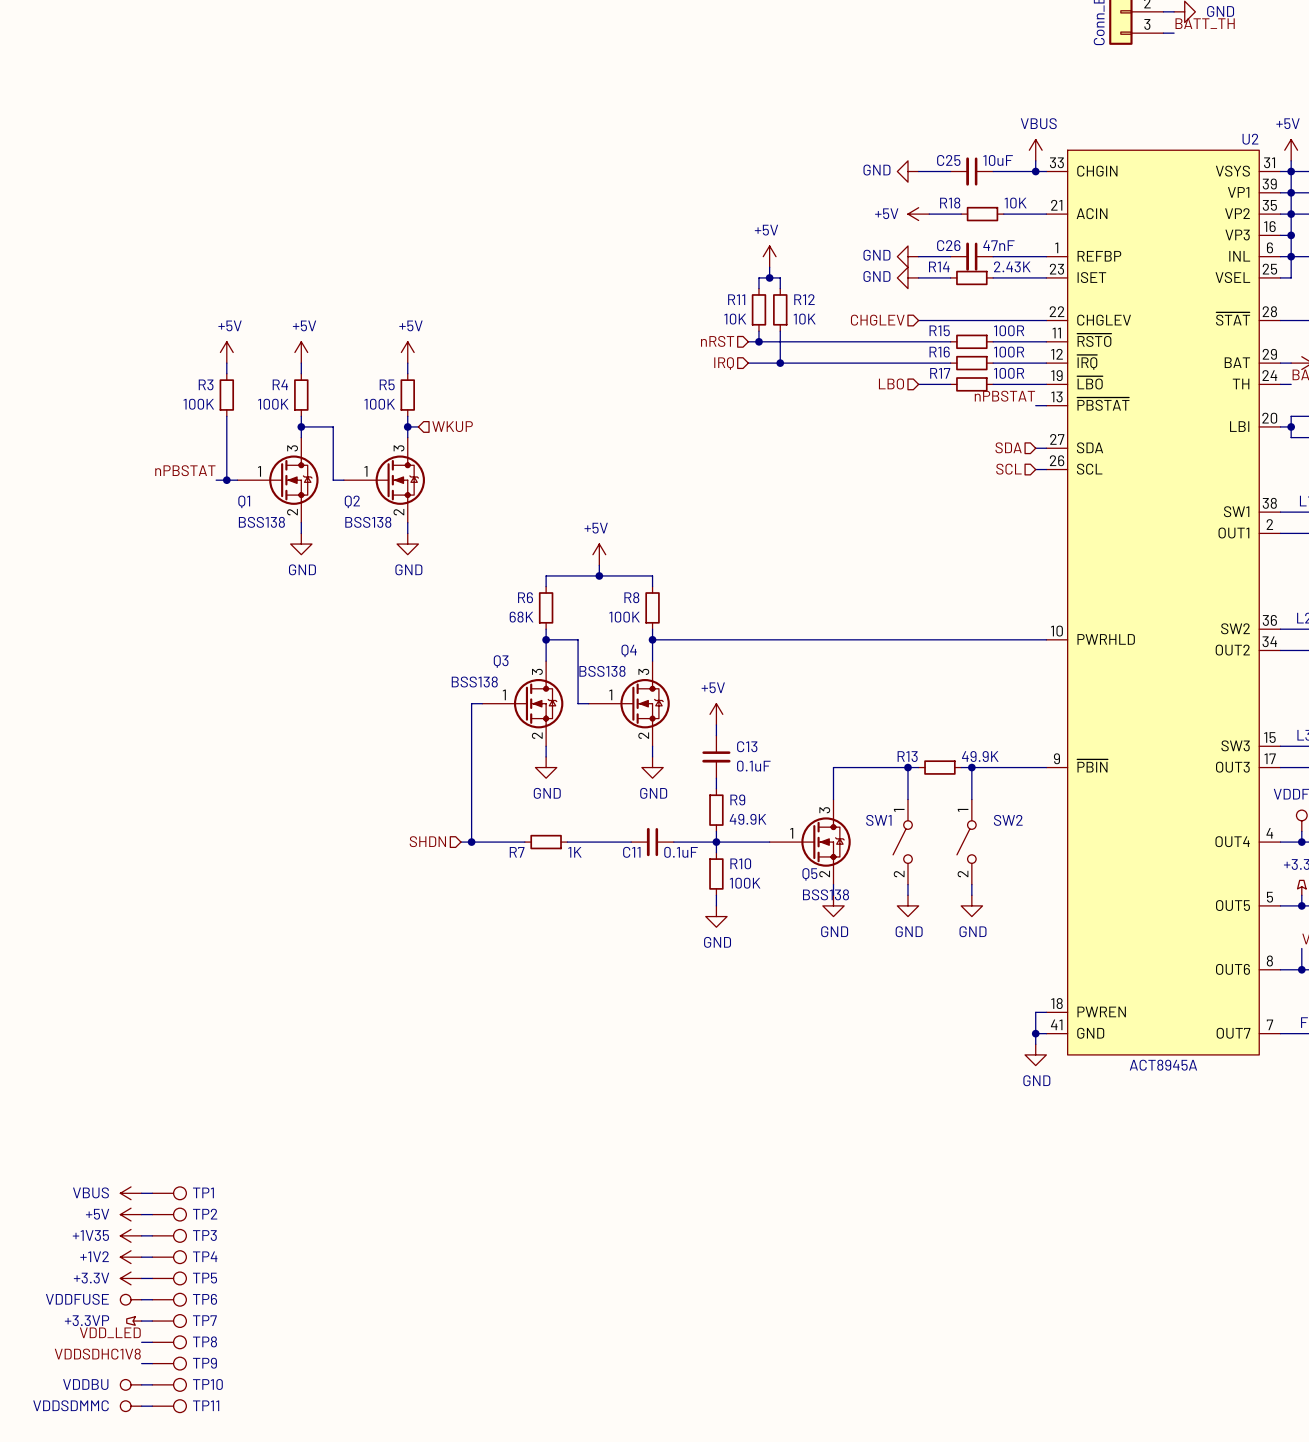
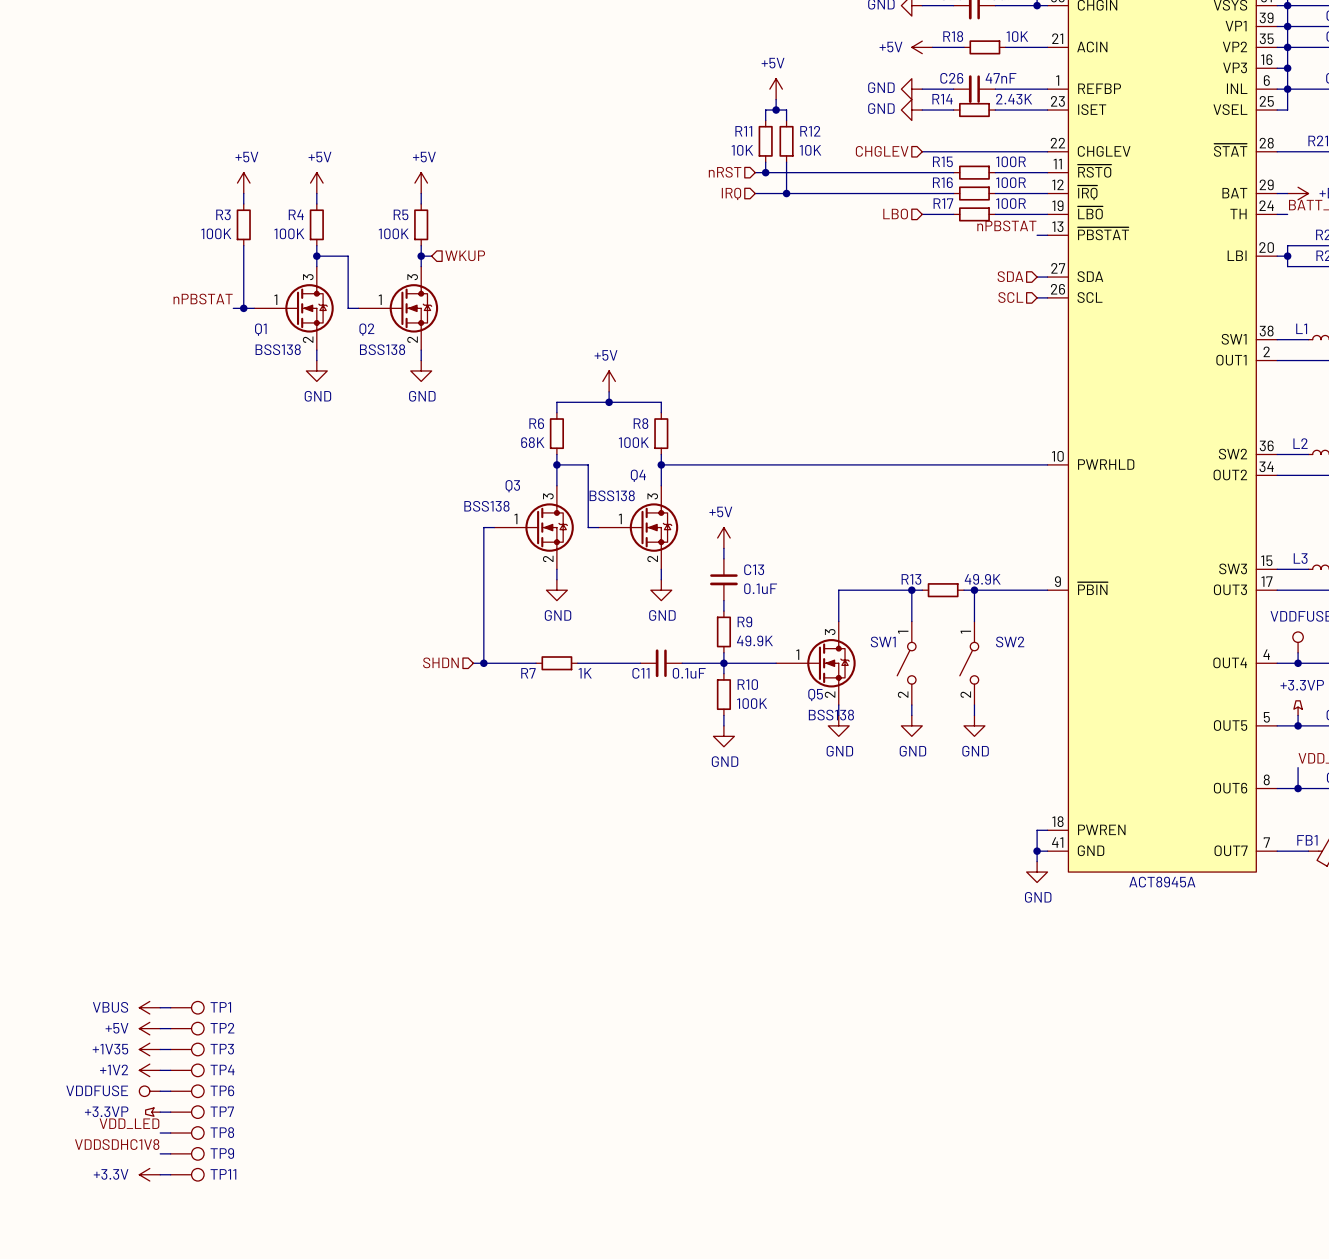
power symbol: +3.3V (131, 1278) -> VDDFUSE (149, 1091)
TP5 name: TP5 (205, 1278) -> TP6 (222, 1090)
power symbol: VDDFUSE (131, 1299) -> +3.3VP (152, 1112)
TP6 name: TP6 (205, 1299) -> TP7 (222, 1111)
label: none -> VDD_LED (129, 1123)
TP7 name: TP7 (204, 1320) -> TP8 (222, 1132)
power symbol: +3.3VP (134, 1321) -> none
label: VDD_LED (110, 1332) -> VDDSDHC1V8 (117, 1144)
TP8 name: TP8 (204, 1341) -> TP9 (222, 1153)
label: VDDSDHC1V8 (97, 1354) -> none
power symbol: none -> +3.3V (149, 1174)
TP9 name: TP9 (204, 1363) -> TP11 (223, 1174)
power symbol: VDDBU (131, 1384) -> none
wire: (141, 1384) (152, 1384) -> none
TP10: (169, 1384) -> none
power symbol: VDDSDMMC (131, 1406) -> none
wire: (141, 1406) (152, 1406) -> none
TP11: (169, 1406) -> none

